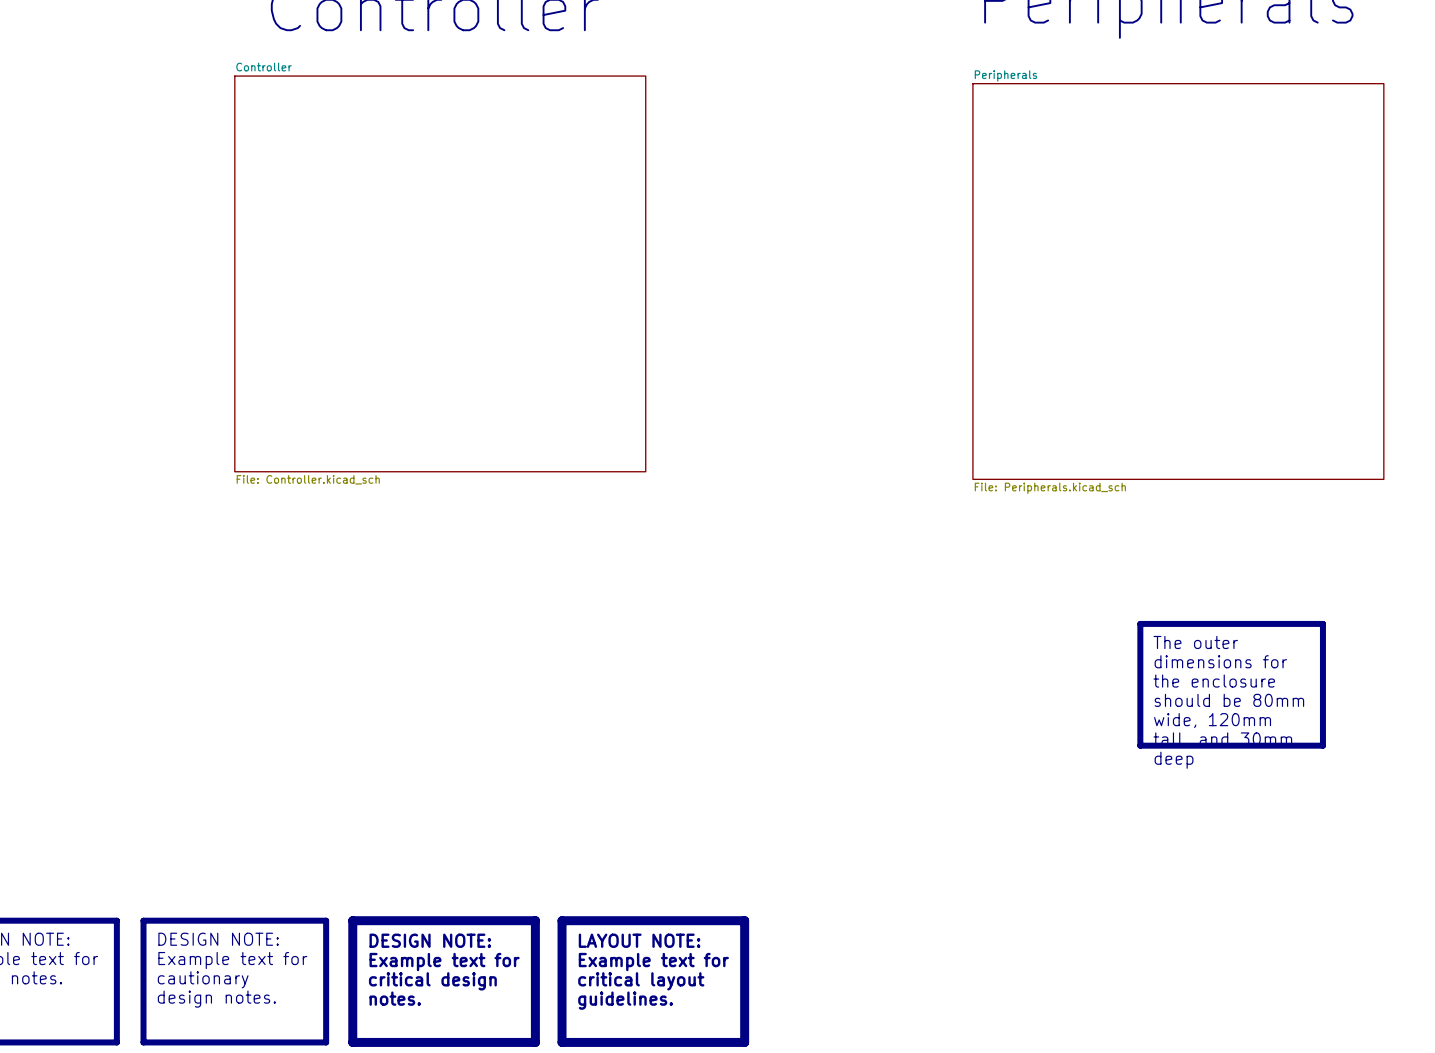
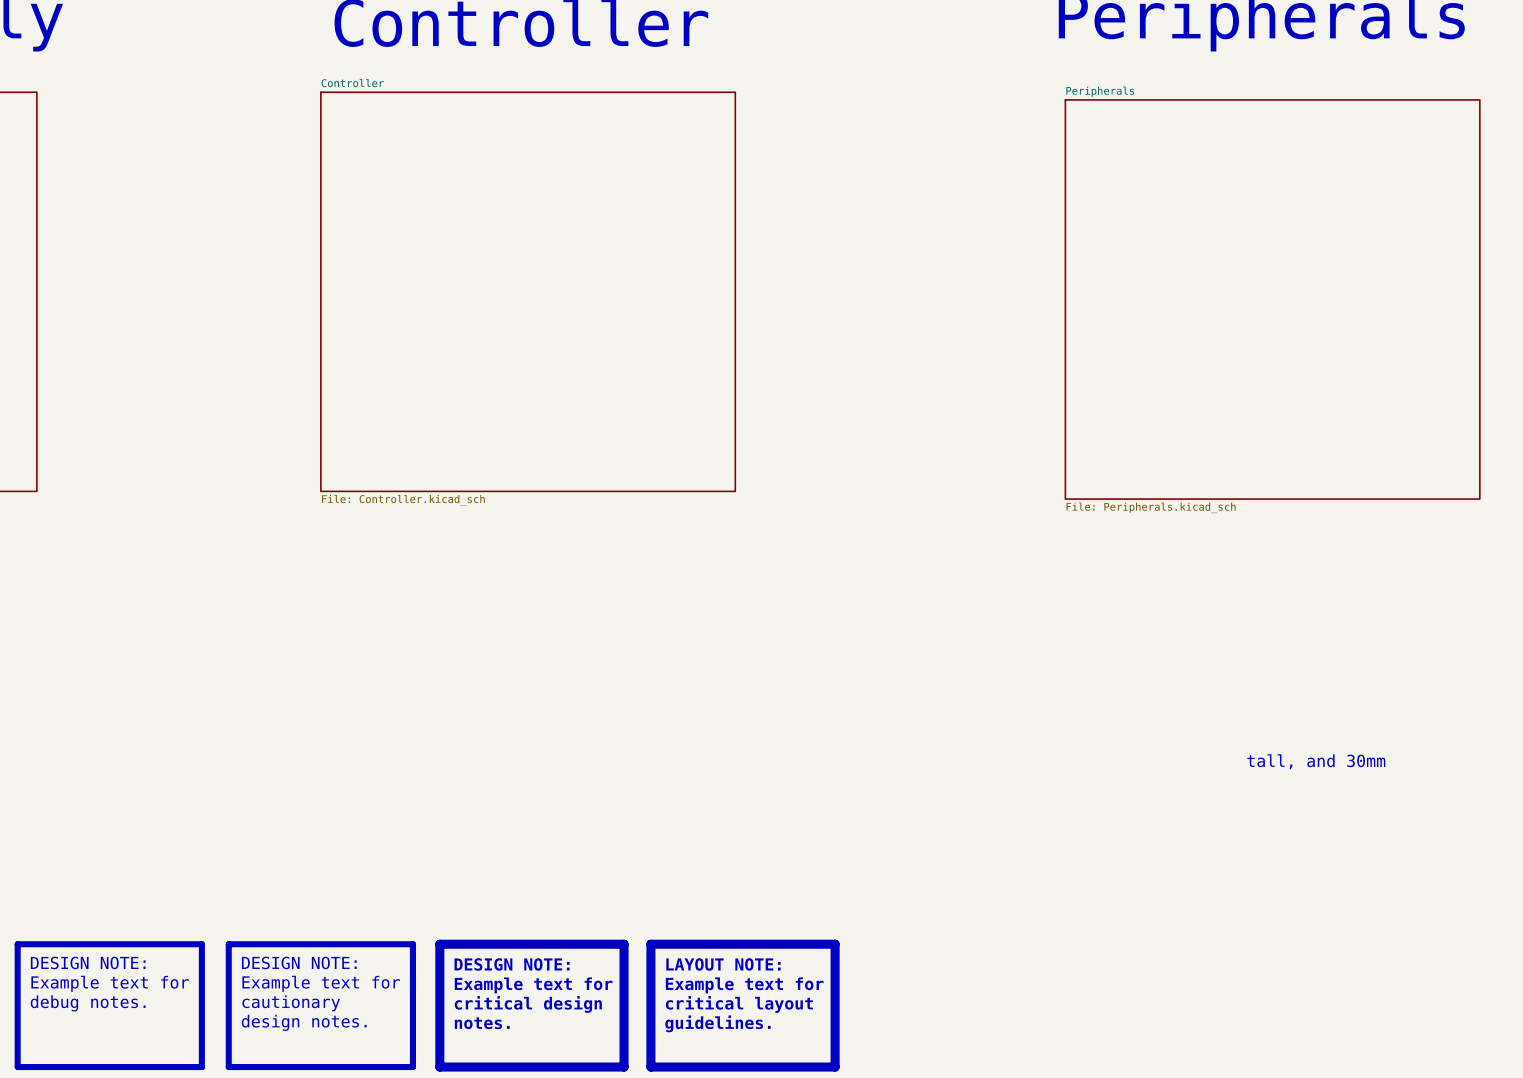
line: (1140, 623) (1322, 623) (1322, 745) (1140, 745) (1140, 623) -> none
text: The outer (1195, 642) -> none
text: dimensions for (1220, 661) -> none
text: the enclosure (1214, 681) -> none
text: should be 80mm (1229, 700) -> none
text: wide, 120mm (1212, 720) -> none
text: deep (1174, 760) -> none

